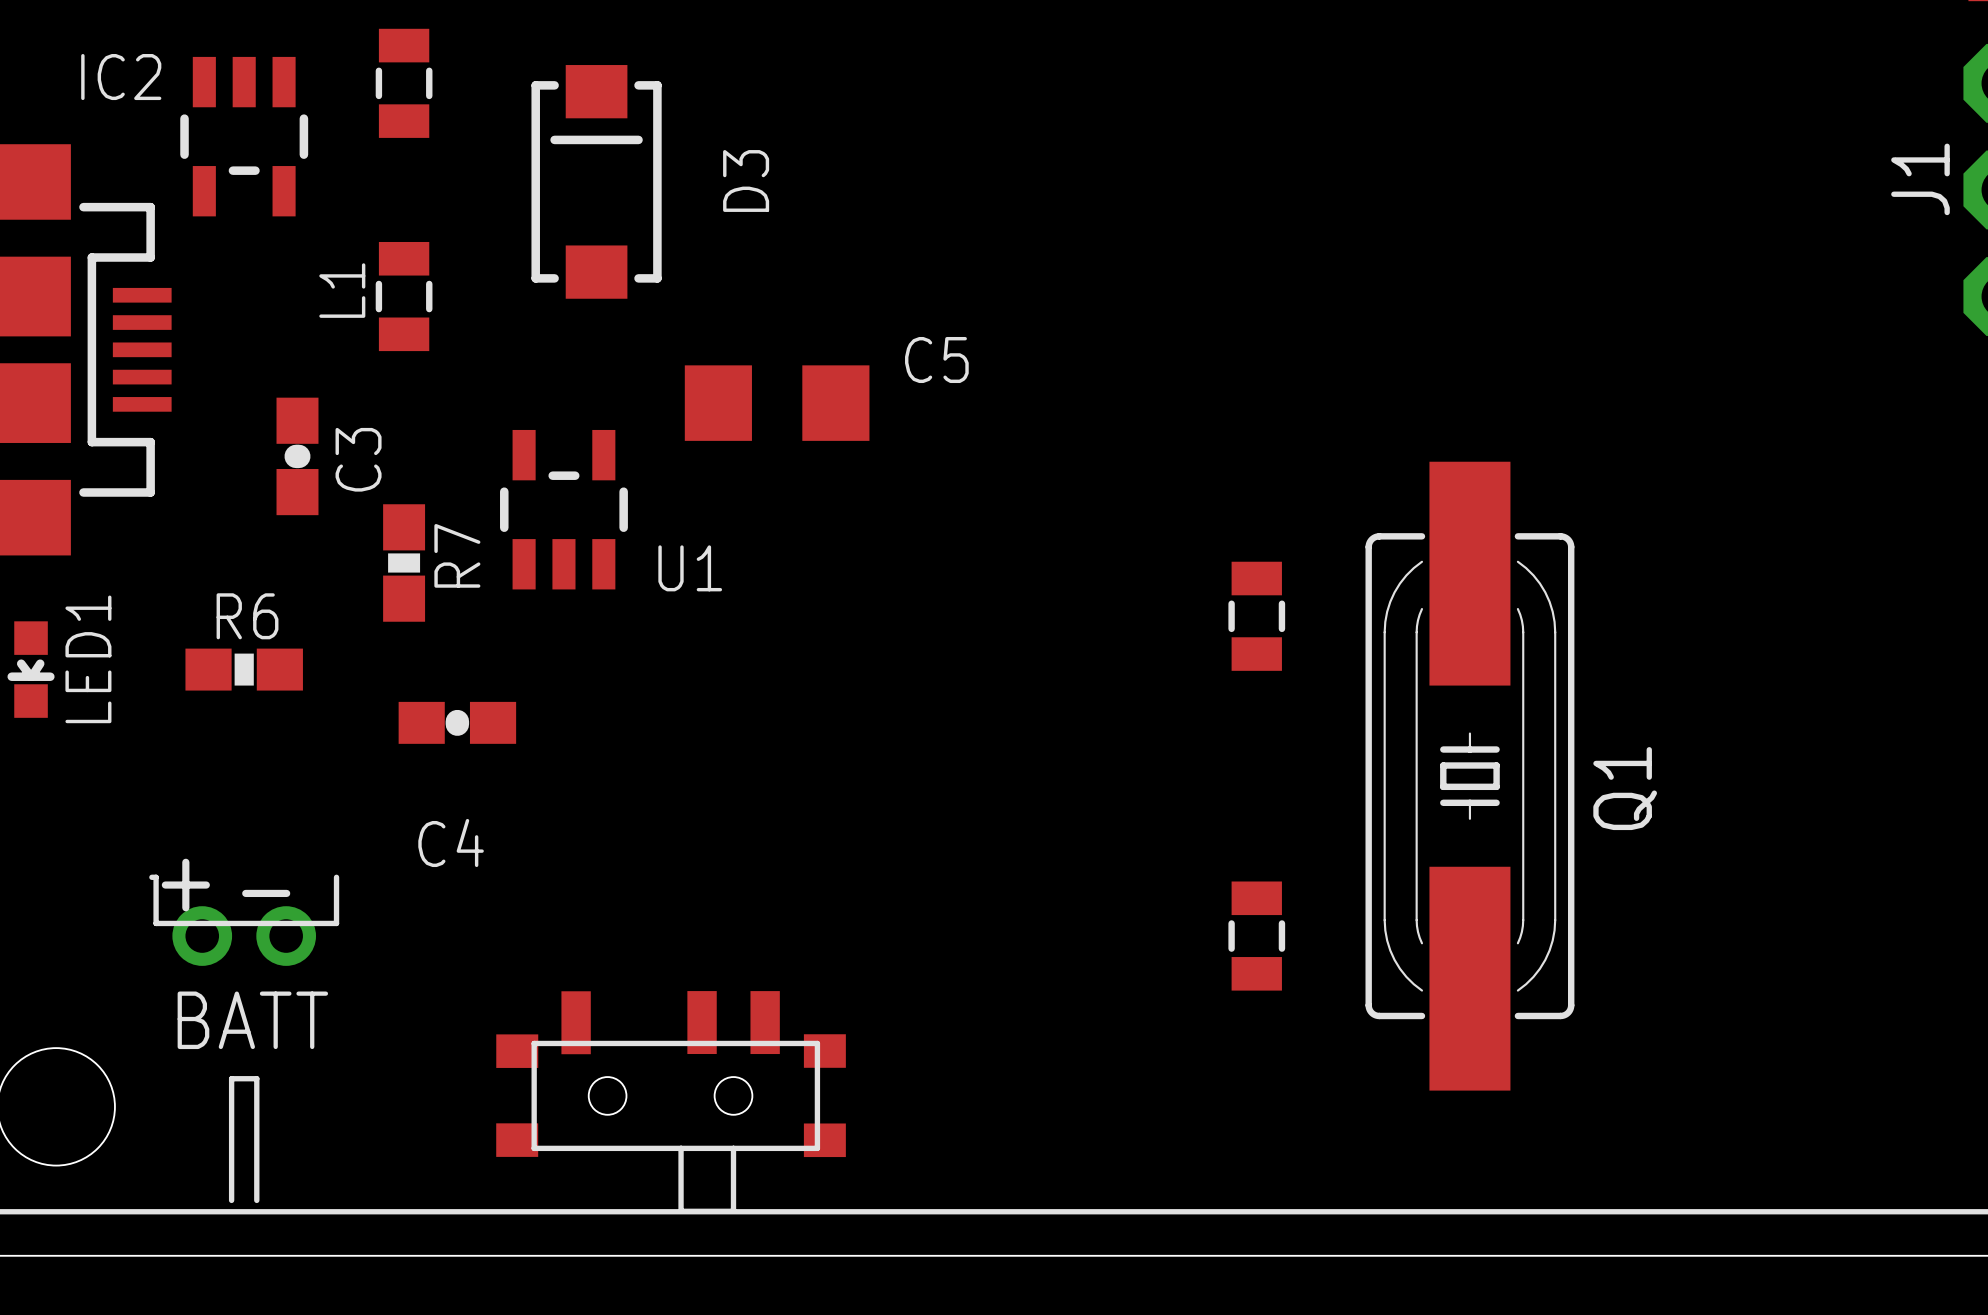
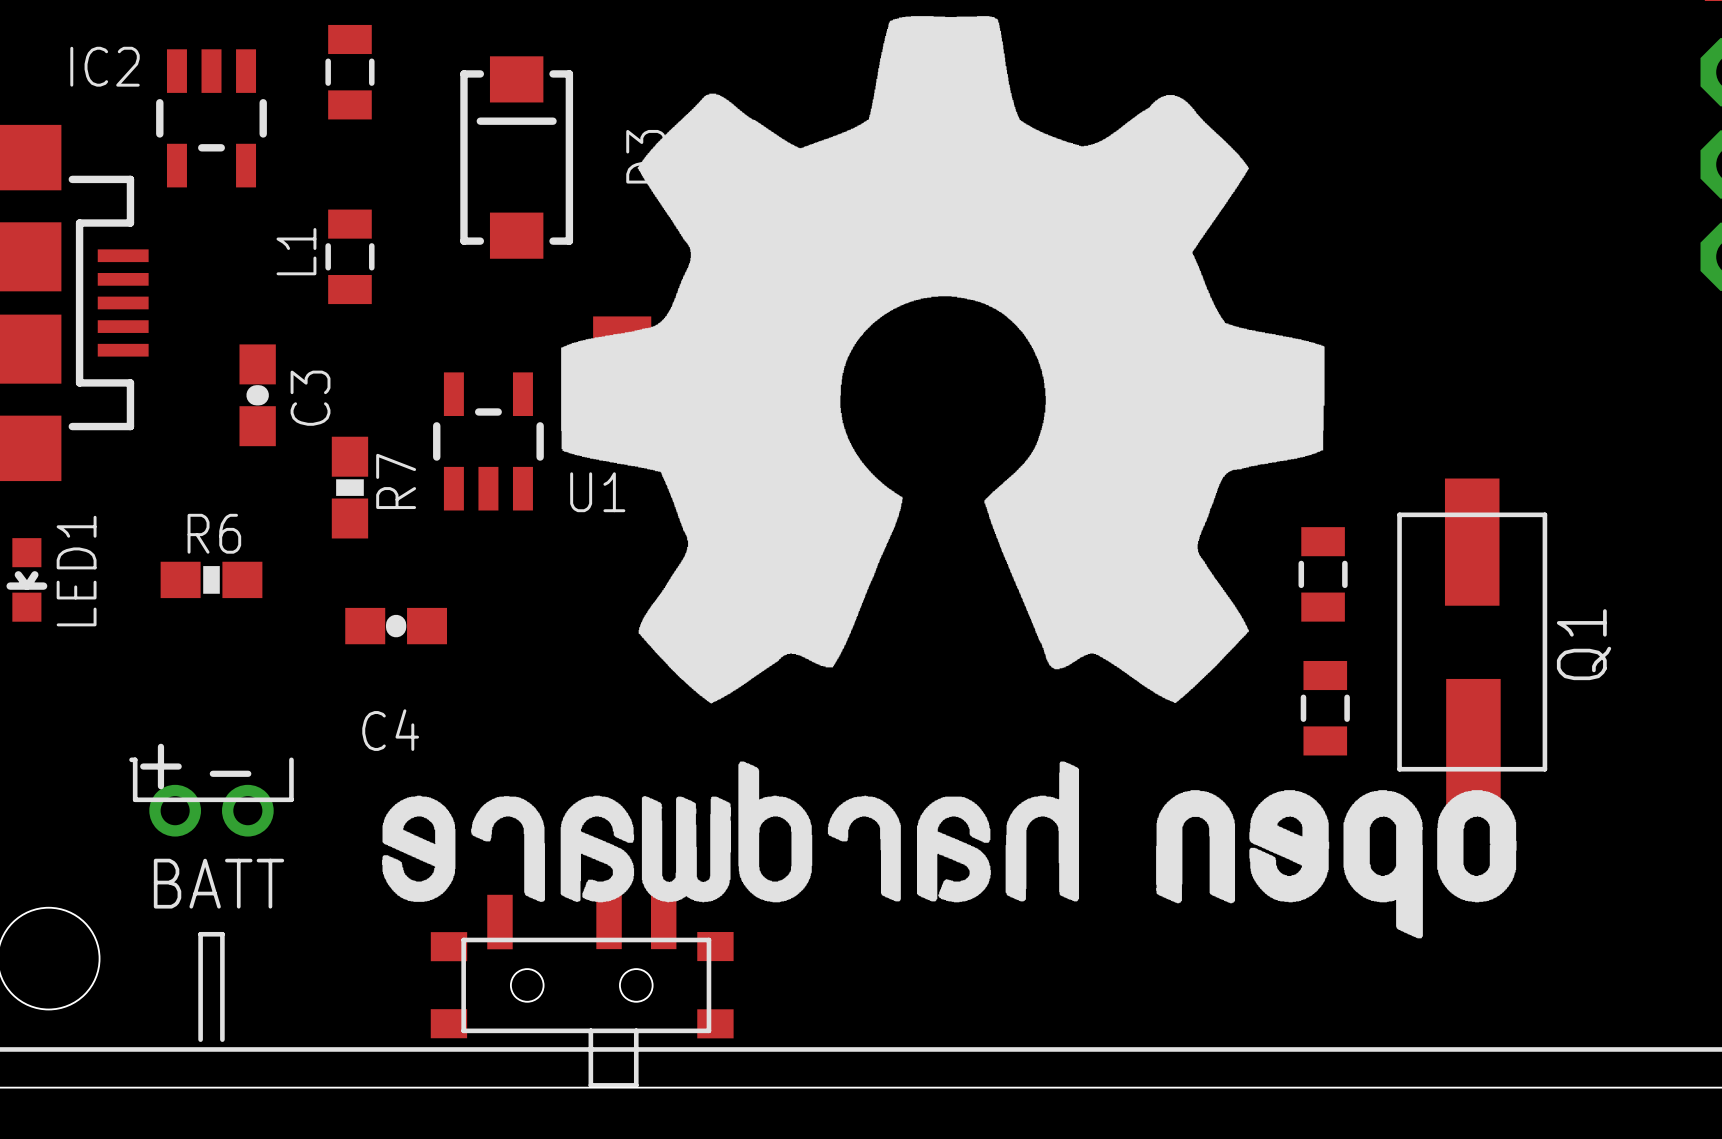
drawing: none -> [382, 16, 1517, 939]
J1 name: J1 (1920, 179) -> none
Q1 footprint: [1365, 461, 1575, 1091] -> [1397, 478, 1548, 807]
part: (1256, 616) -> none
part: none -> (1323, 574)
part: none -> (1325, 708)
part: (1256, 936) -> none
part position: (671, 1102) -> (582, 991)

